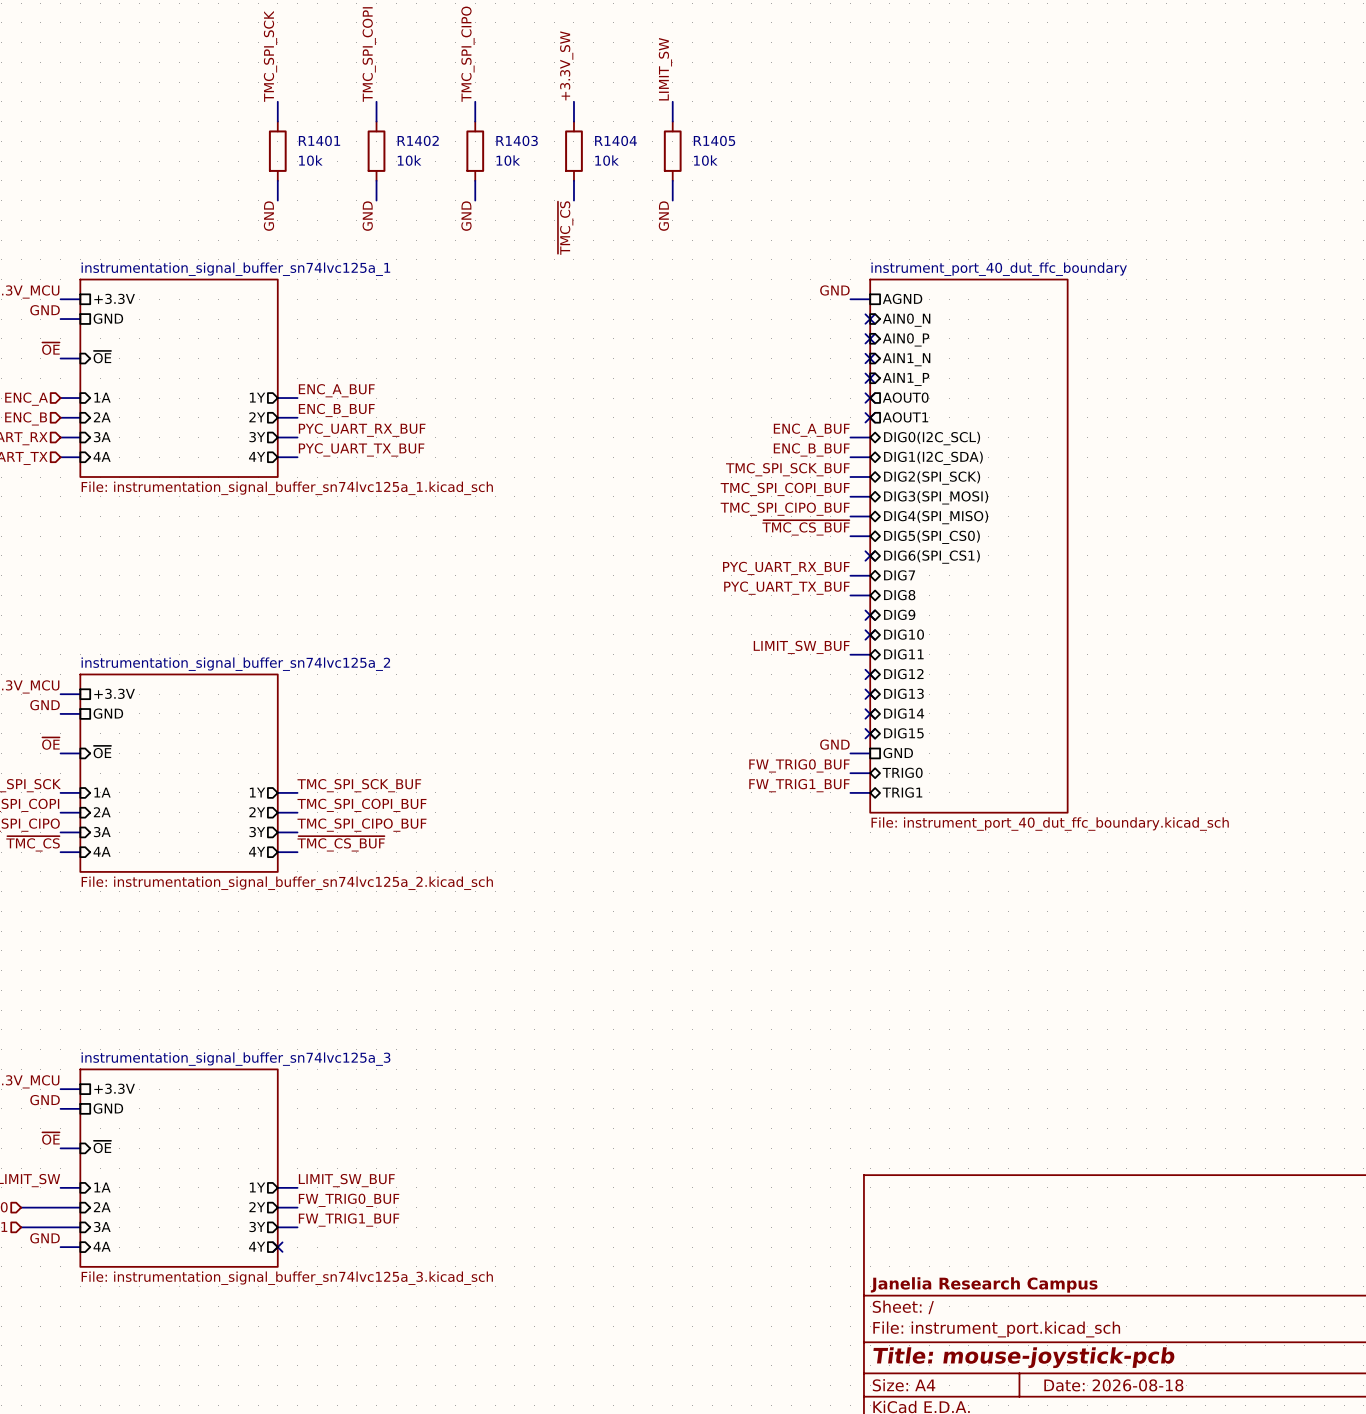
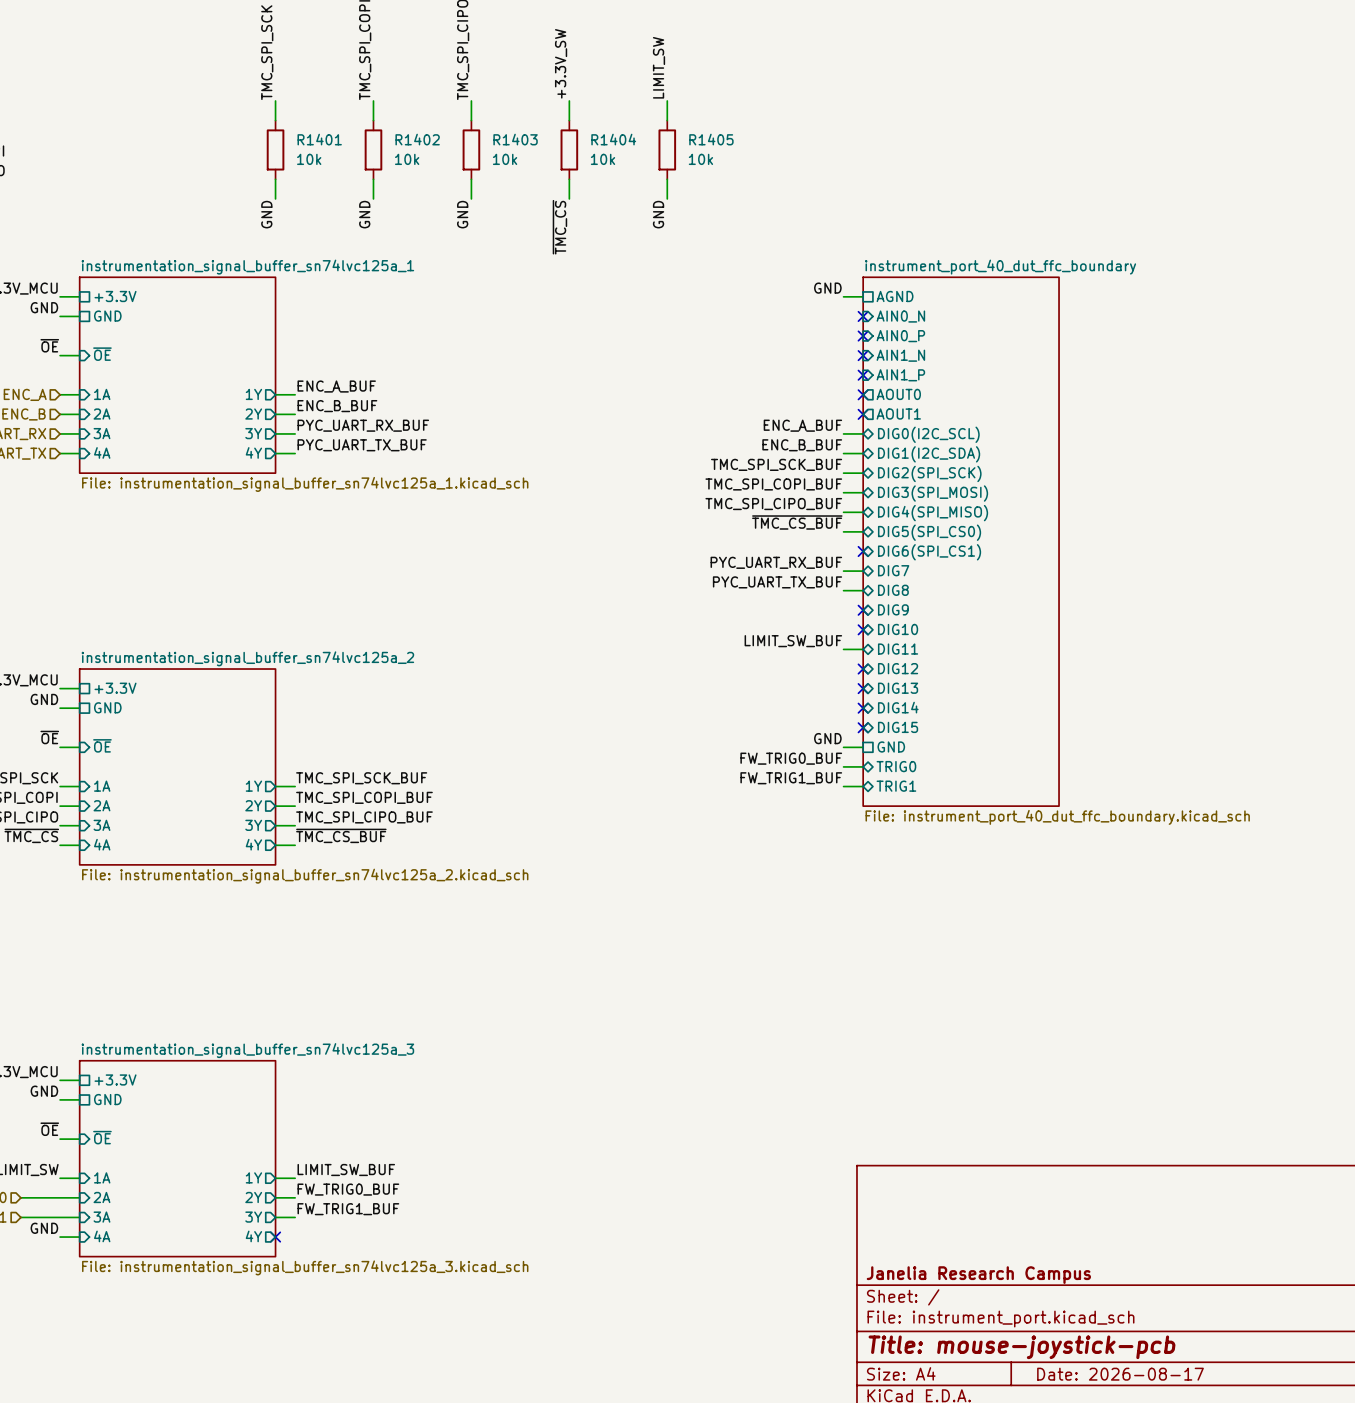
title block: Date: 2026-08-18 (1113, 1385) -> Date: 2026-08-17 (1120, 1374)

